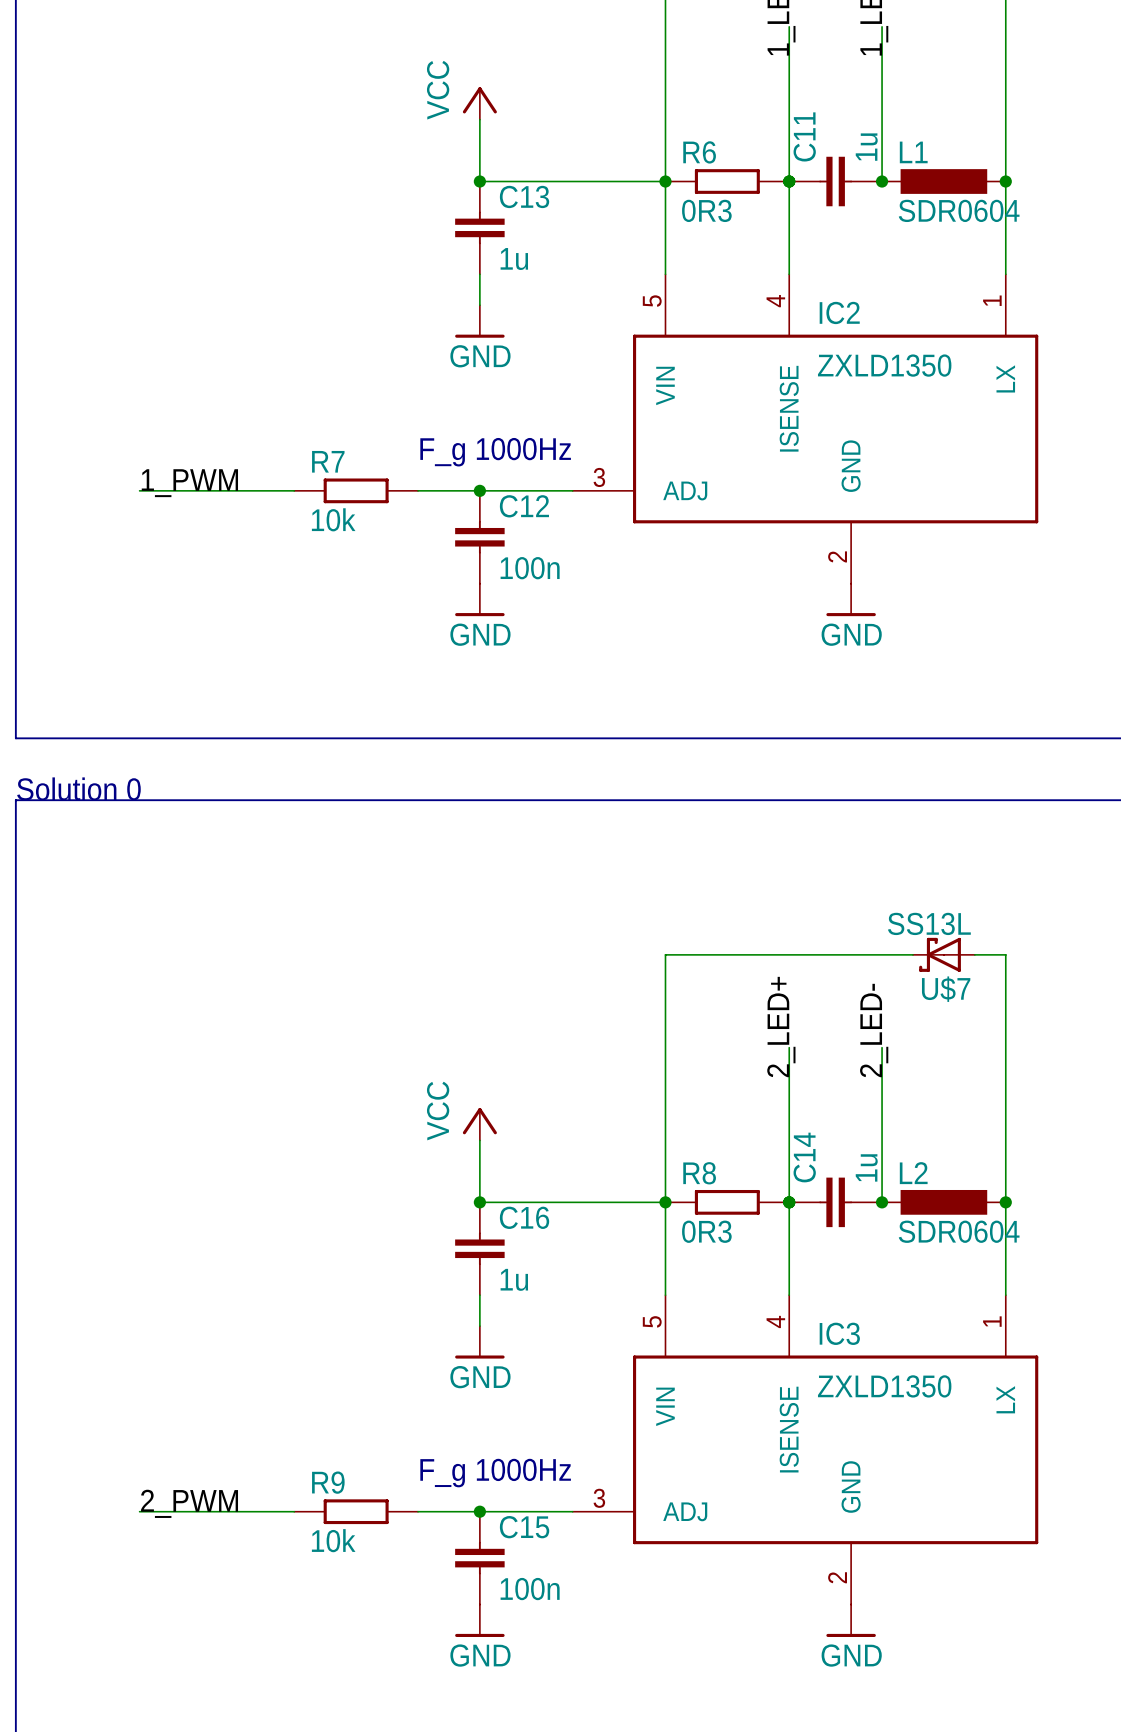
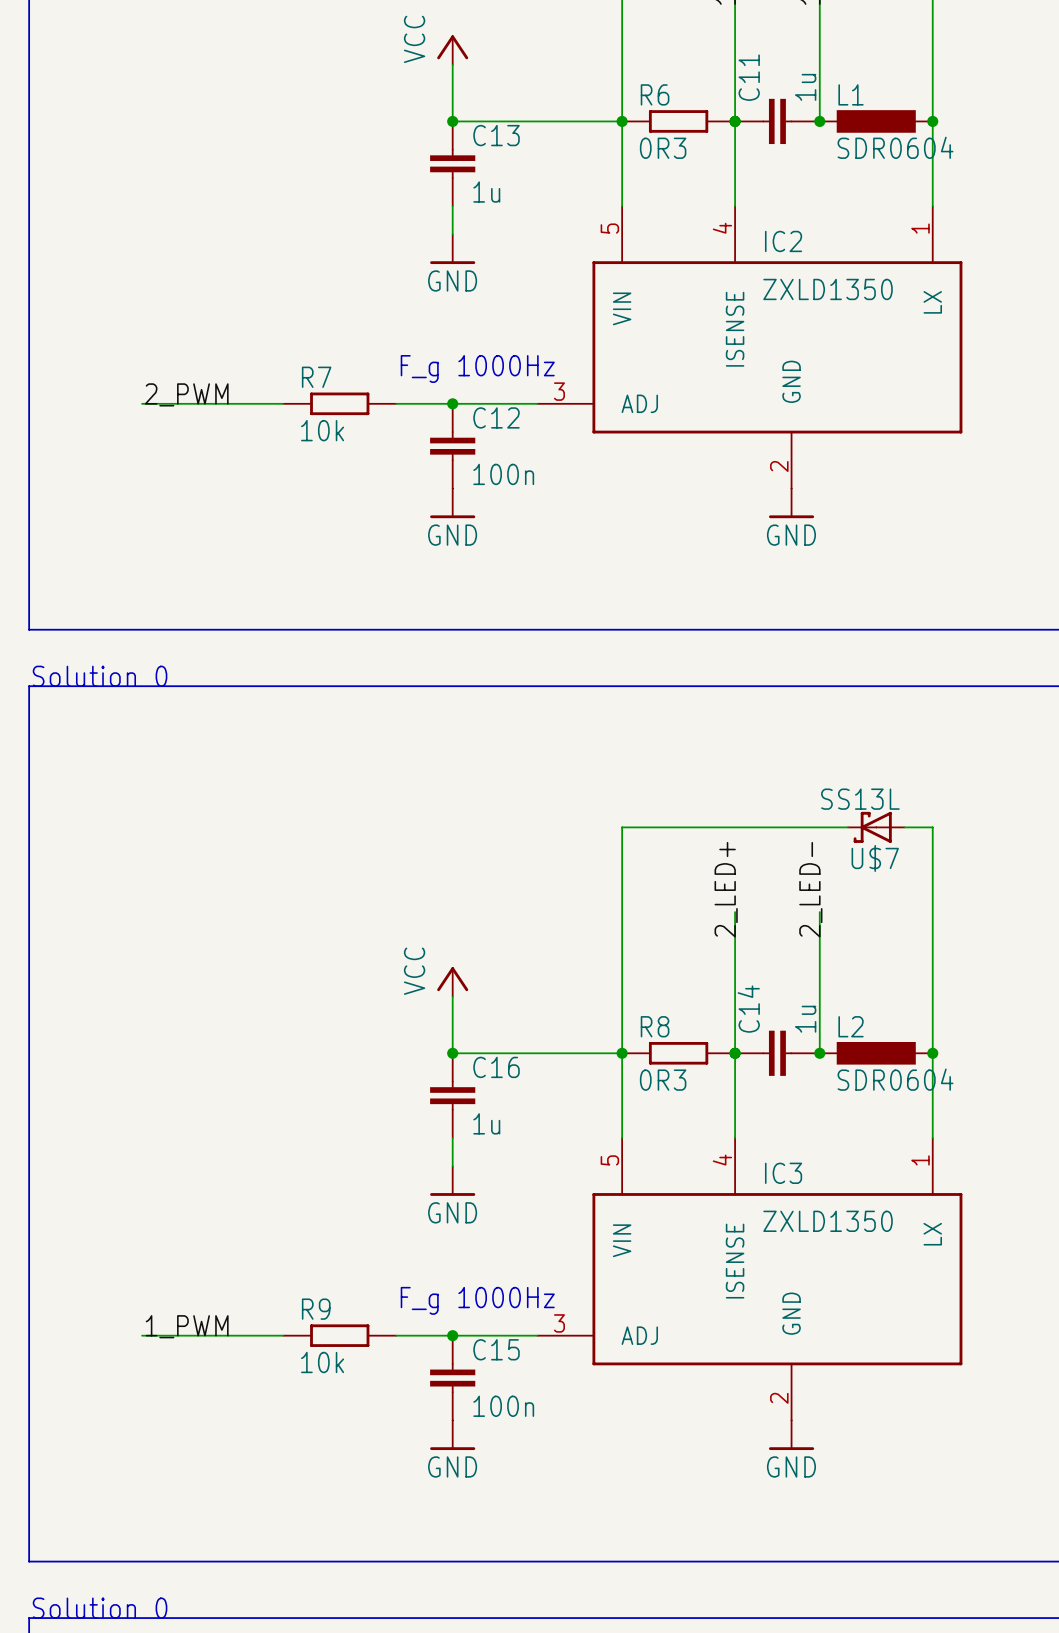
label: 1_PWM (189, 483) -> 2_PWM (186, 394)
label: 2_PWM (189, 1503) -> 1_PWM (187, 1326)

